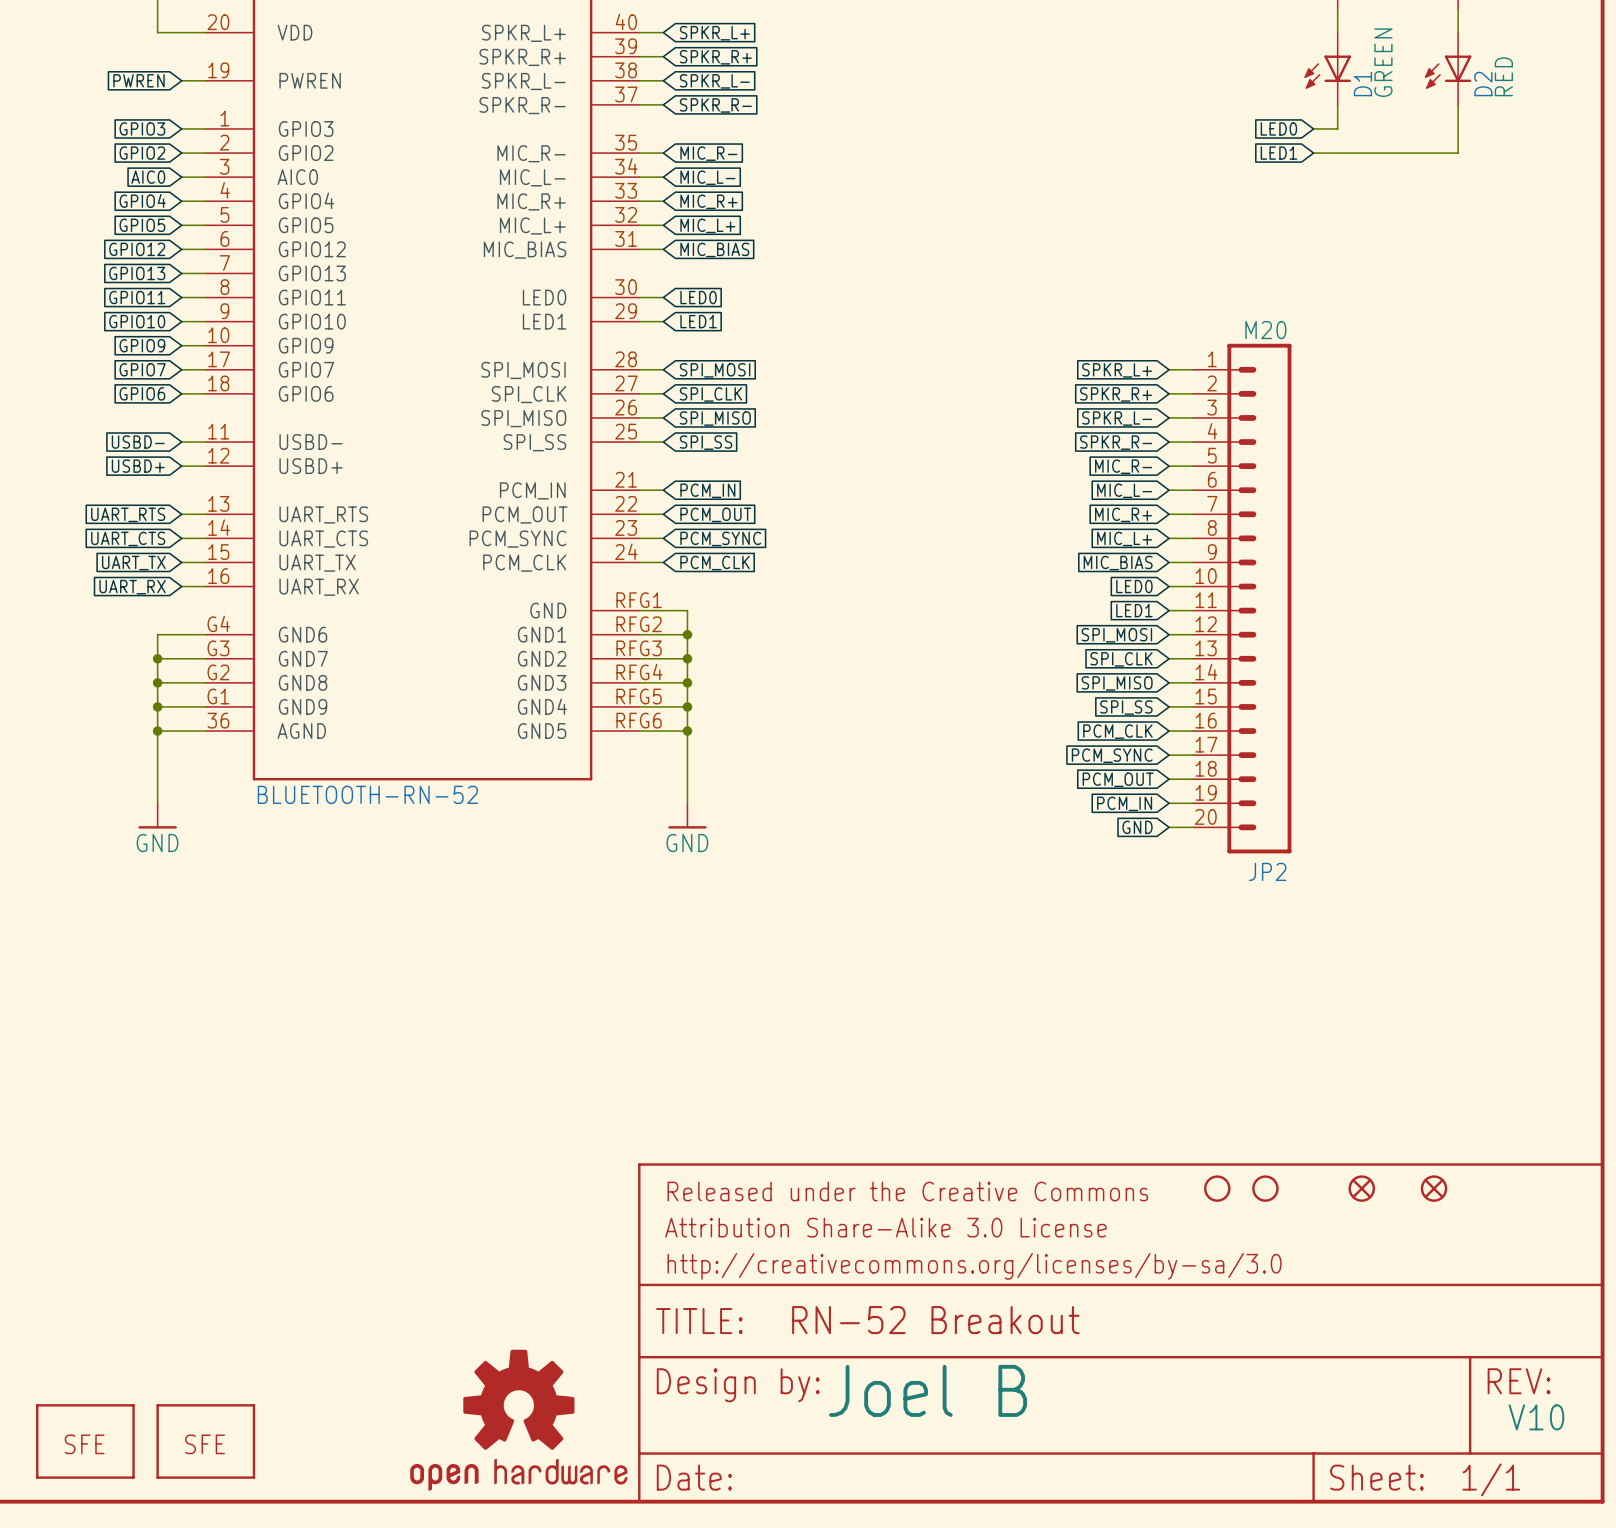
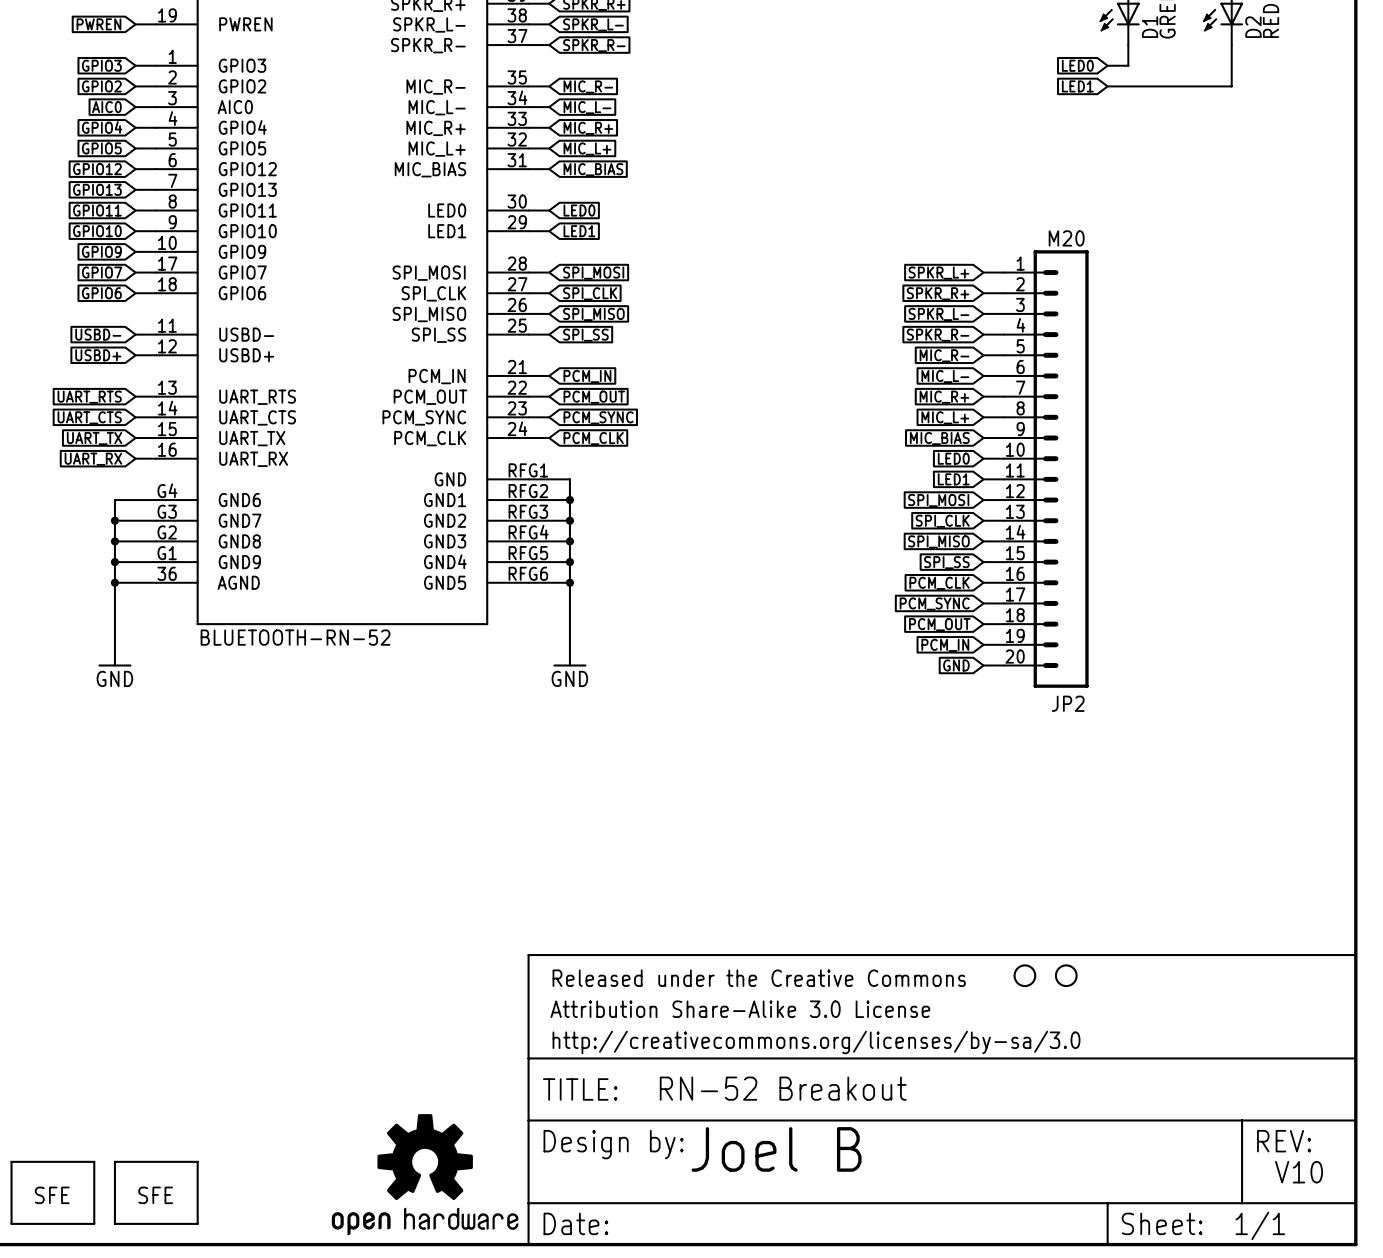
part: (1361, 1188) -> none
part: (1434, 1188) -> none

